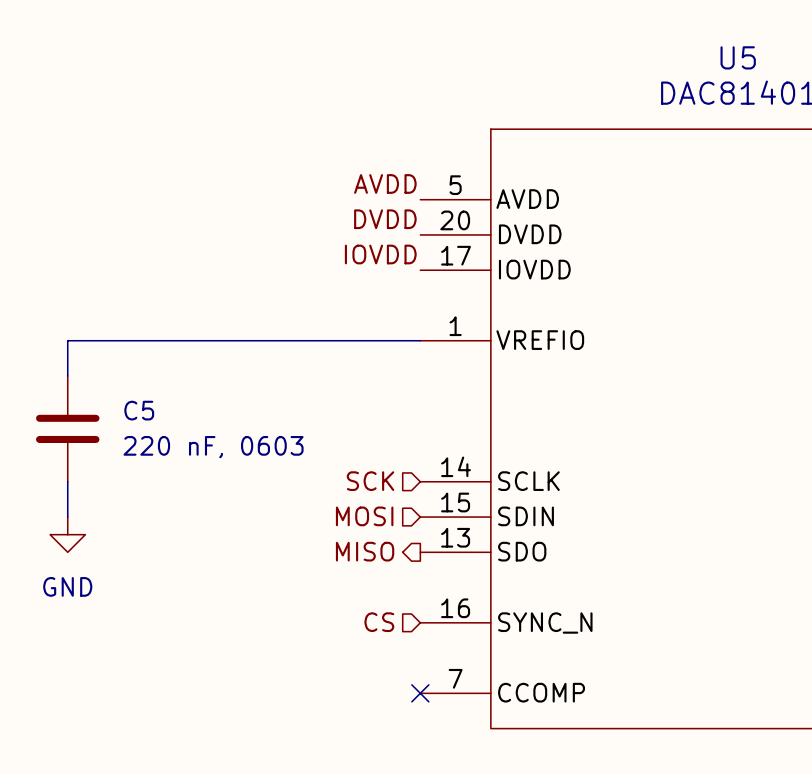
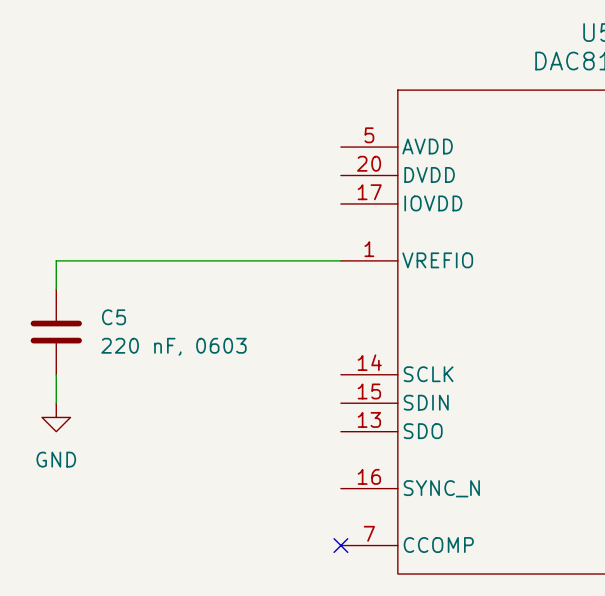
label: AVDD (385, 183) -> none
label: DVDD (385, 219) -> none
label: IOVDD (380, 254) -> none
hierarchical label: SCK (370, 481) -> none
hierarchical label: MOSI (364, 516) -> none
hierarchical label: MISO (365, 551) -> none
hierarchical label: CS (379, 622) -> none

